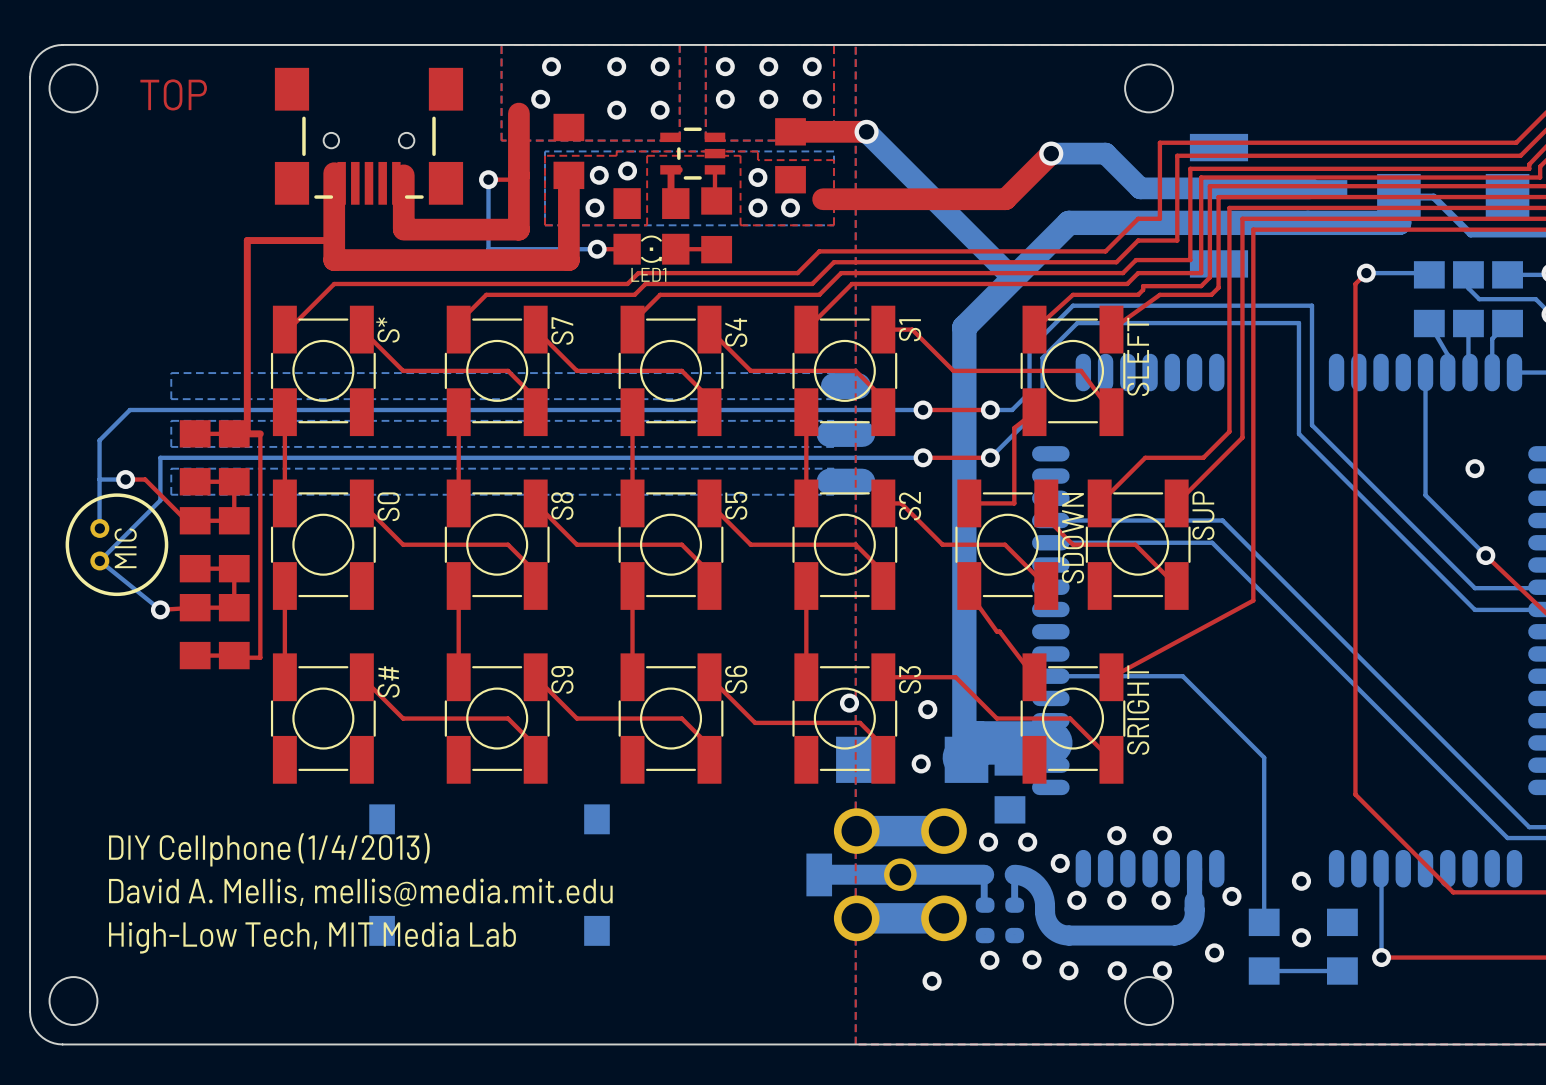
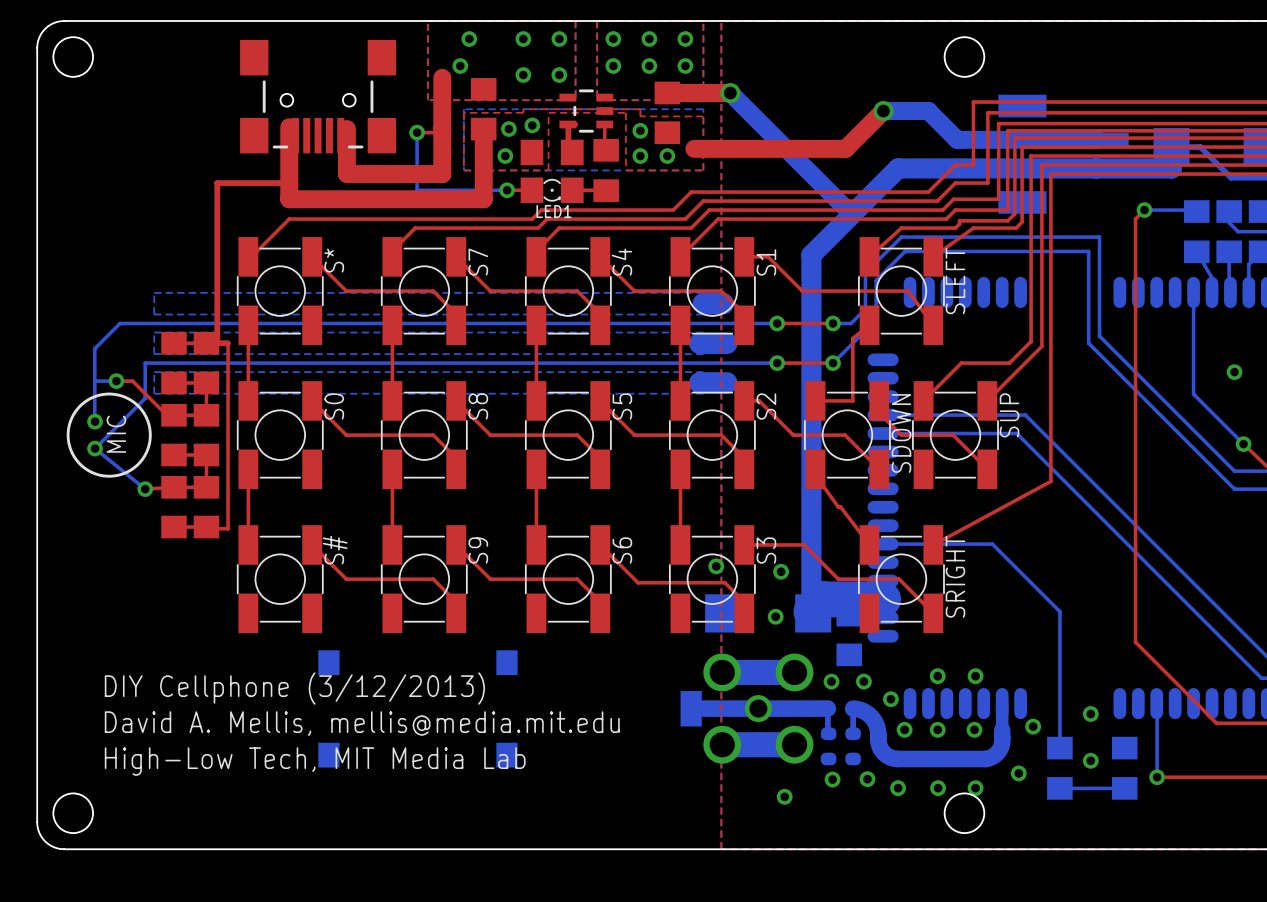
text: TOP (173, 94) -> none
text: DIY Cellphone (1/4/2013) (269, 849) -> DIY Cellphone (3/12/2013) (294, 688)

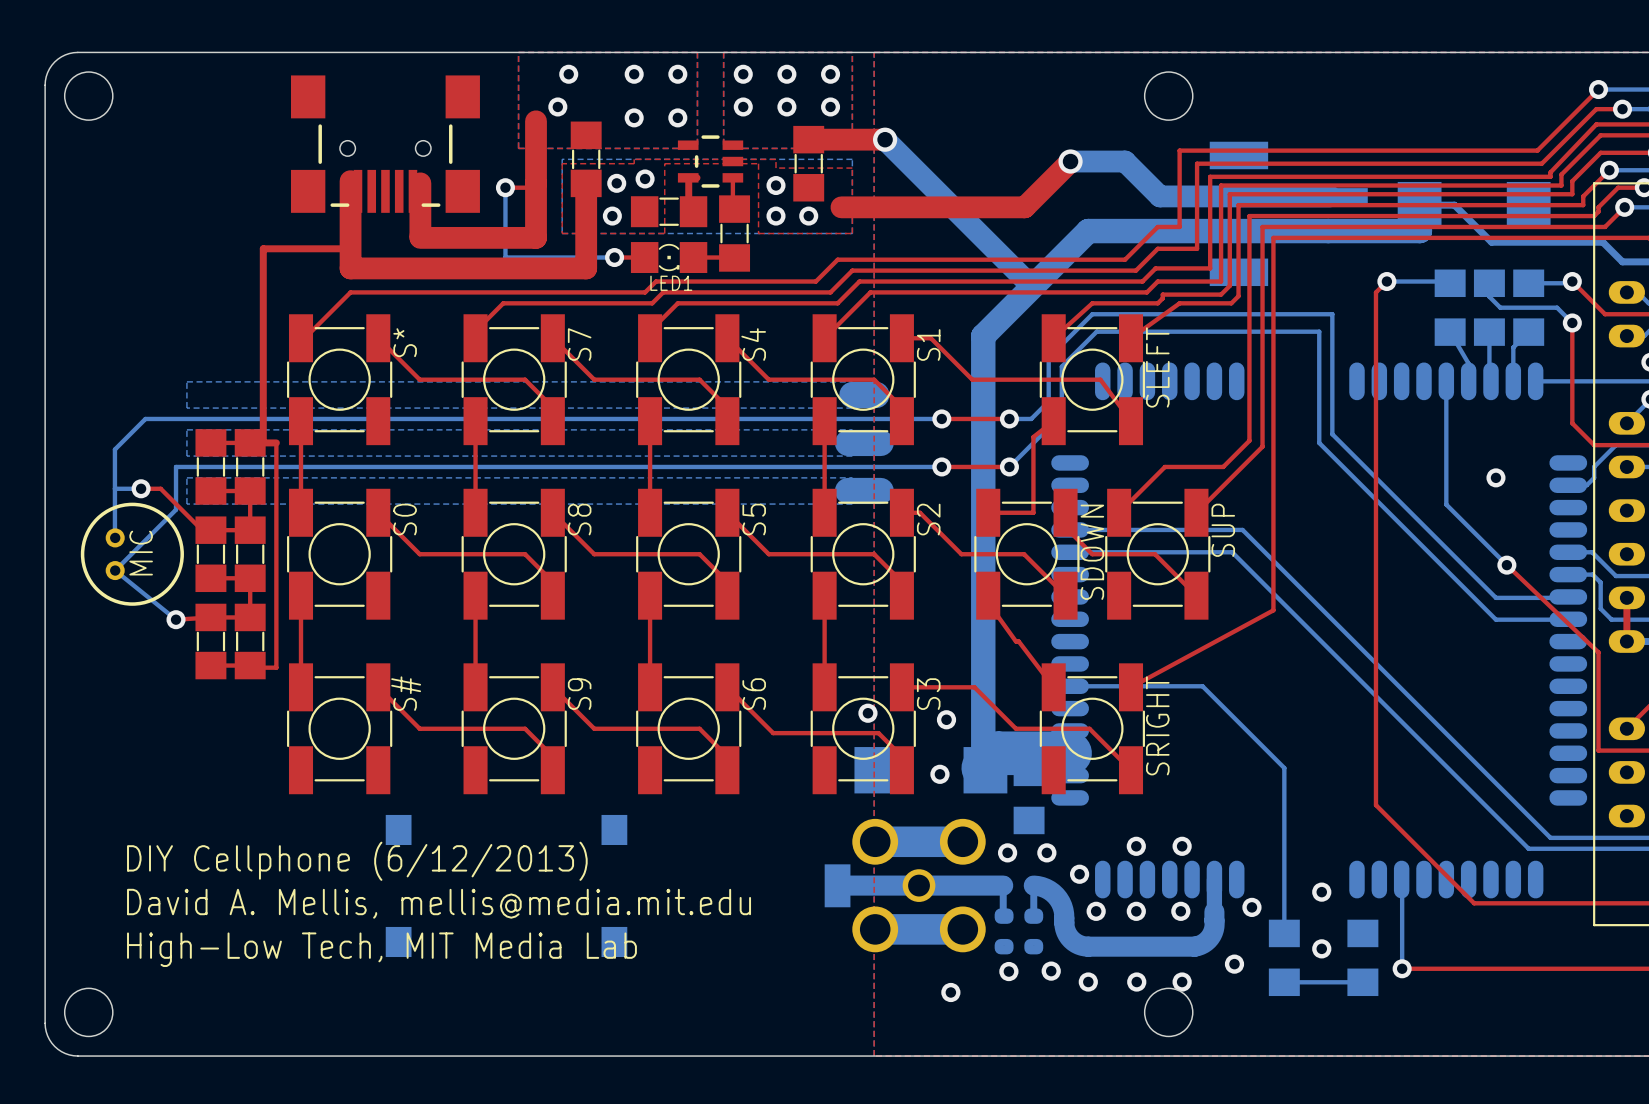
part footprint: [470, 78, 497, 141] -> [570, 121, 602, 198]
part footprint: [654, 81, 681, 145] -> [793, 125, 825, 202]
part footprint: [593, 138, 619, 202] -> [719, 195, 751, 272]
part footprint: [520, 139, 584, 166] -> [630, 196, 708, 228]
part footprint: [161, 331, 187, 395] -> [195, 429, 227, 505]
part footprint: [193, 331, 220, 395] -> [234, 429, 266, 505]
part footprint: [161, 403, 187, 467] -> [195, 516, 227, 593]
part footprint: [193, 403, 220, 467] -> [234, 516, 266, 593]
part footprint: [161, 475, 187, 539] -> [195, 603, 227, 680]
part footprint: [193, 475, 220, 539] -> [234, 603, 266, 680]
text: DIY Cellphone (3/12/2013) (294, 688) -> DIY Cellphone (6/12/2013) (357, 861)

